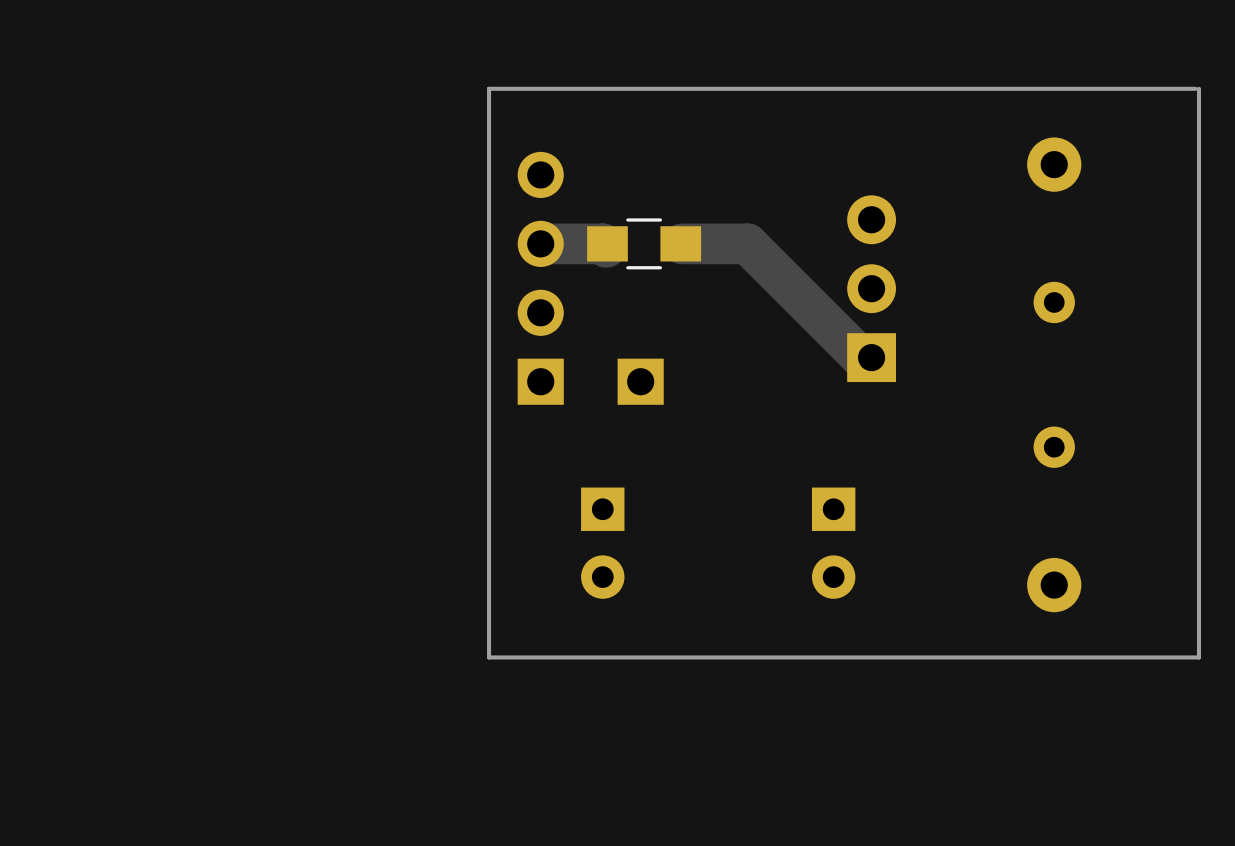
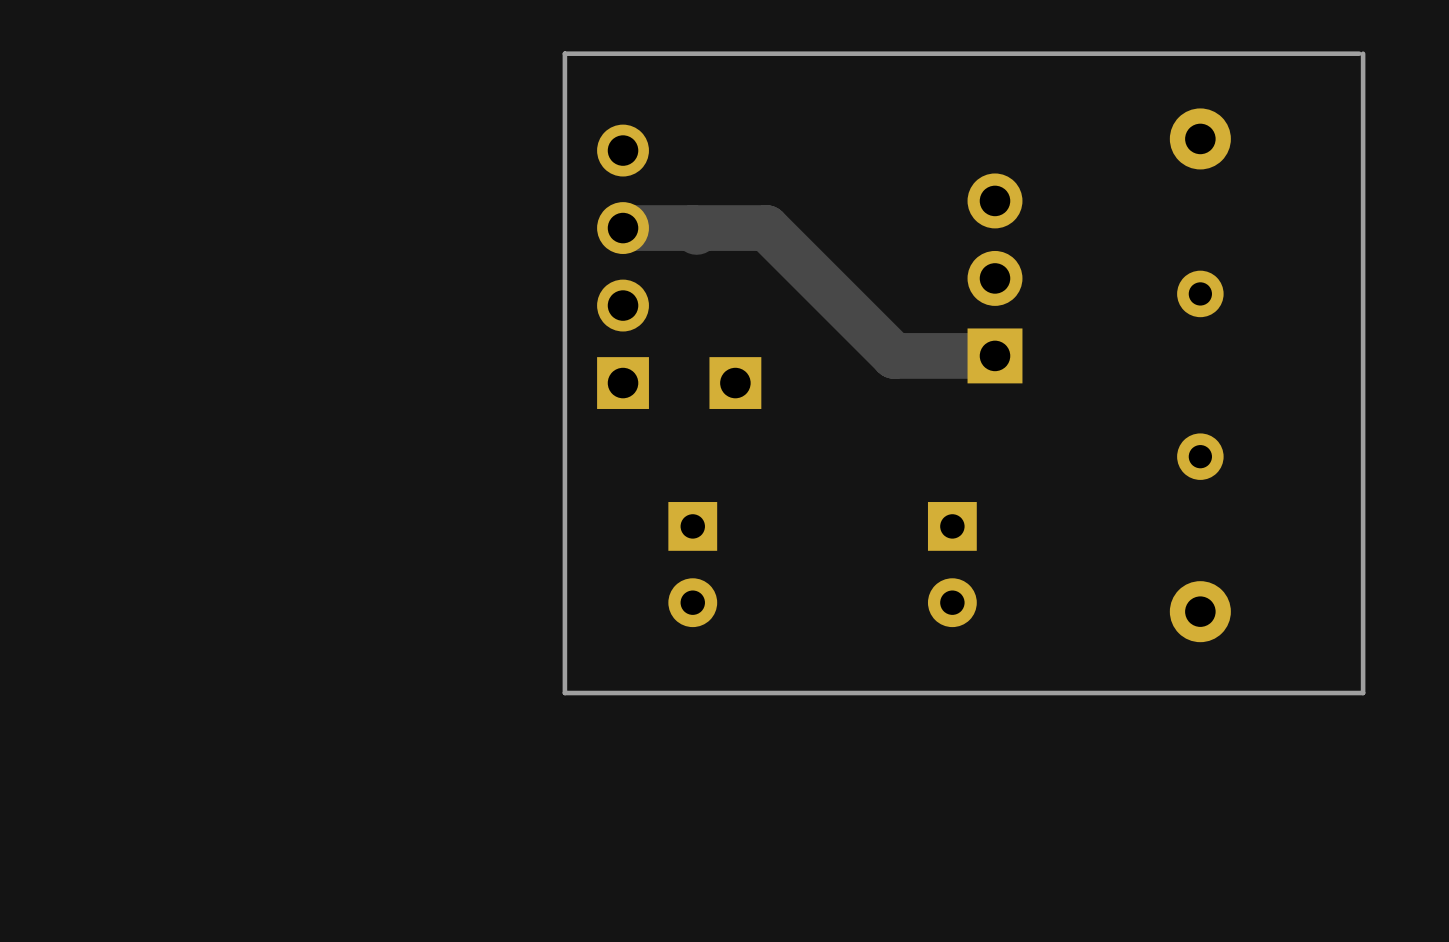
part: (644, 243) -> none
track: (682, 243) (747, 243) (861, 357) -> (692, 228) (766, 228) (894, 355) (983, 355)

